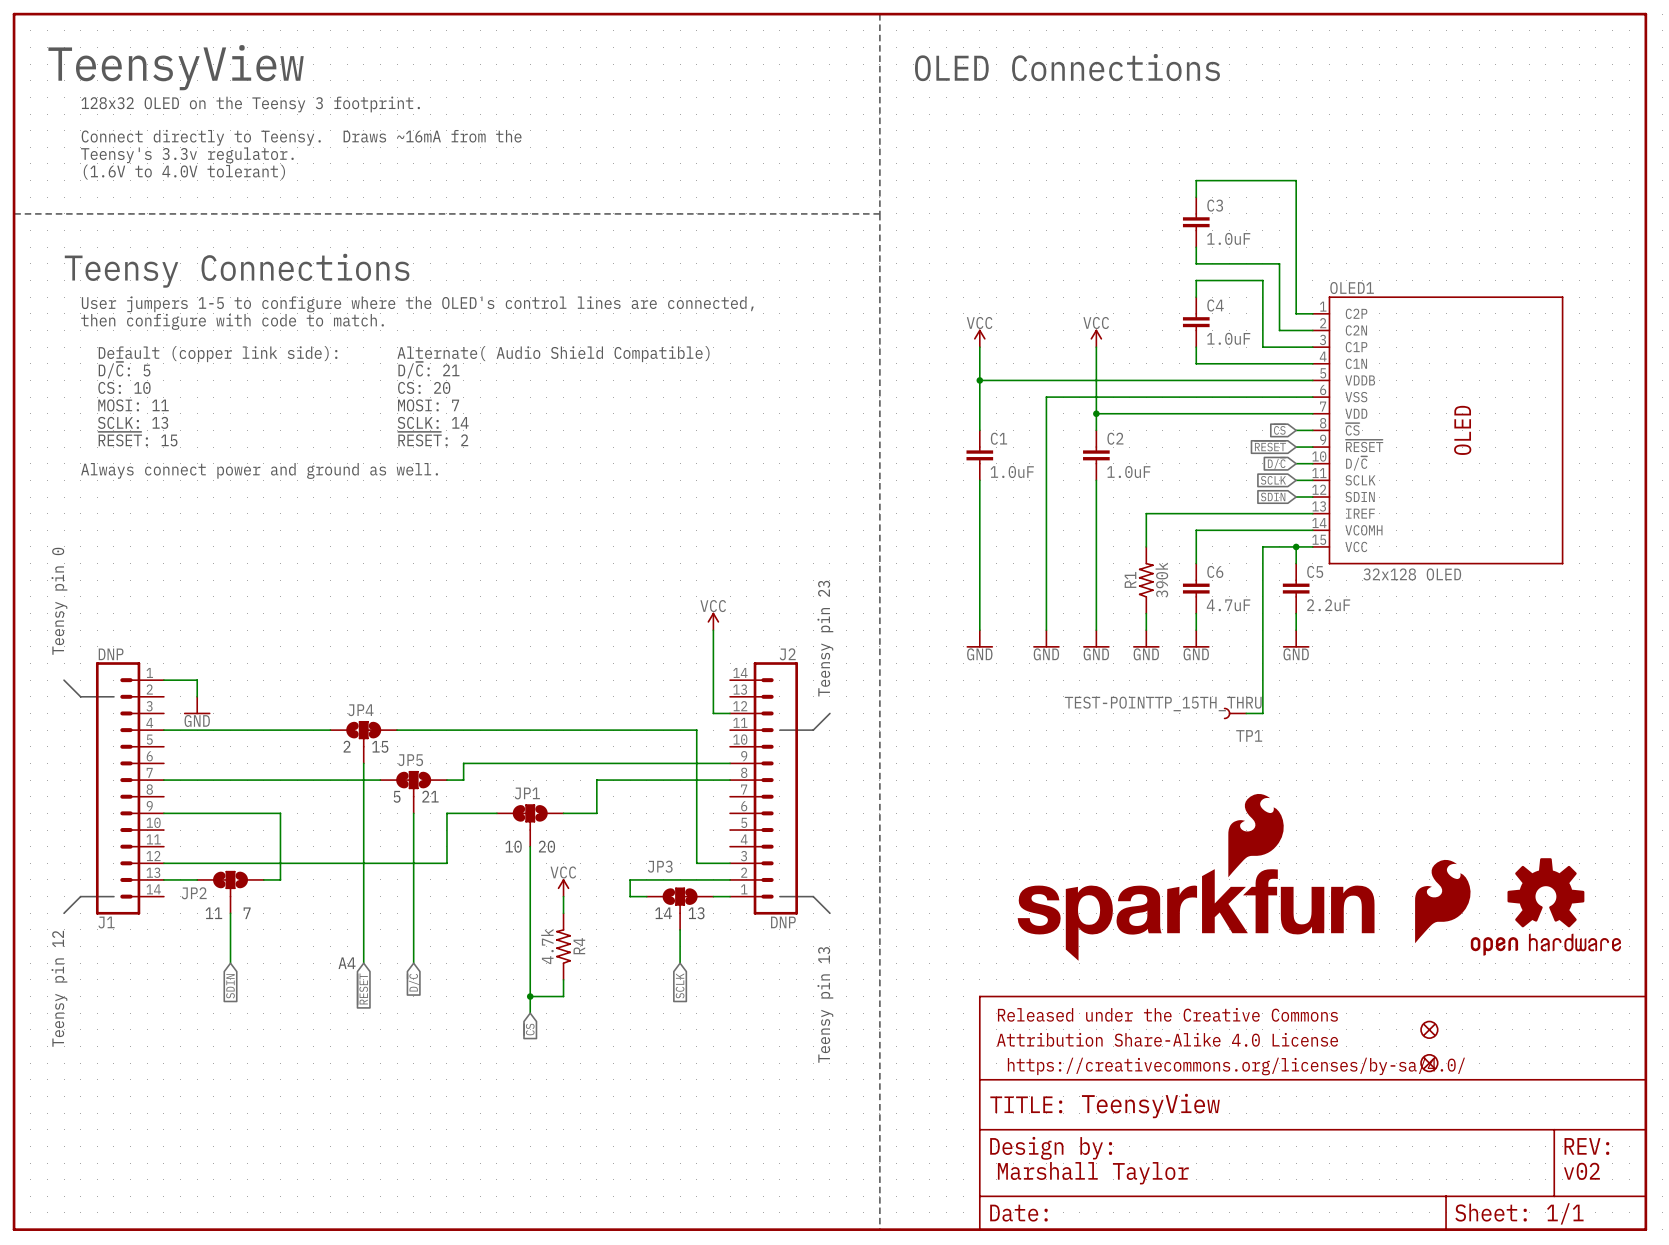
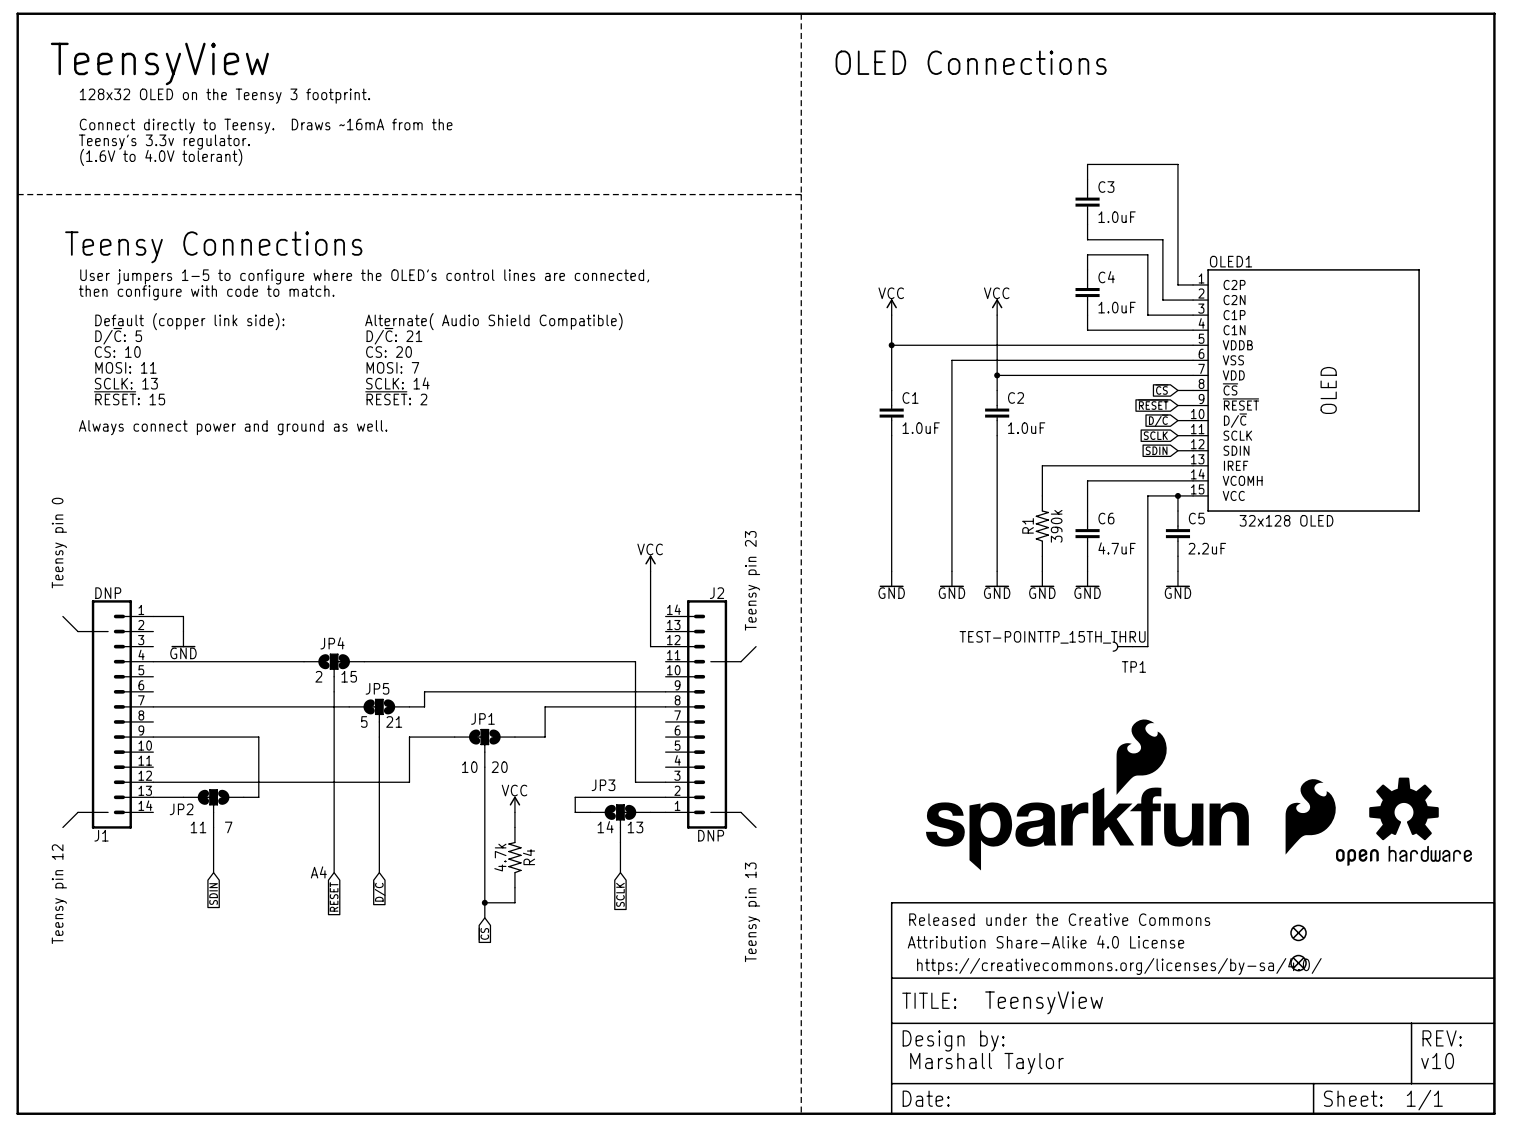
text: v02 (1581, 1171) -> v10 (1437, 1061)

